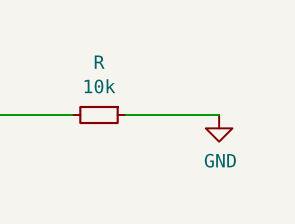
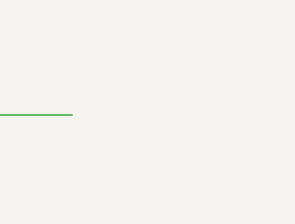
R: 10k (99, 115) -> none
wire: (125, 115) (219, 115) -> none
power symbol: GND (219, 128) -> none

